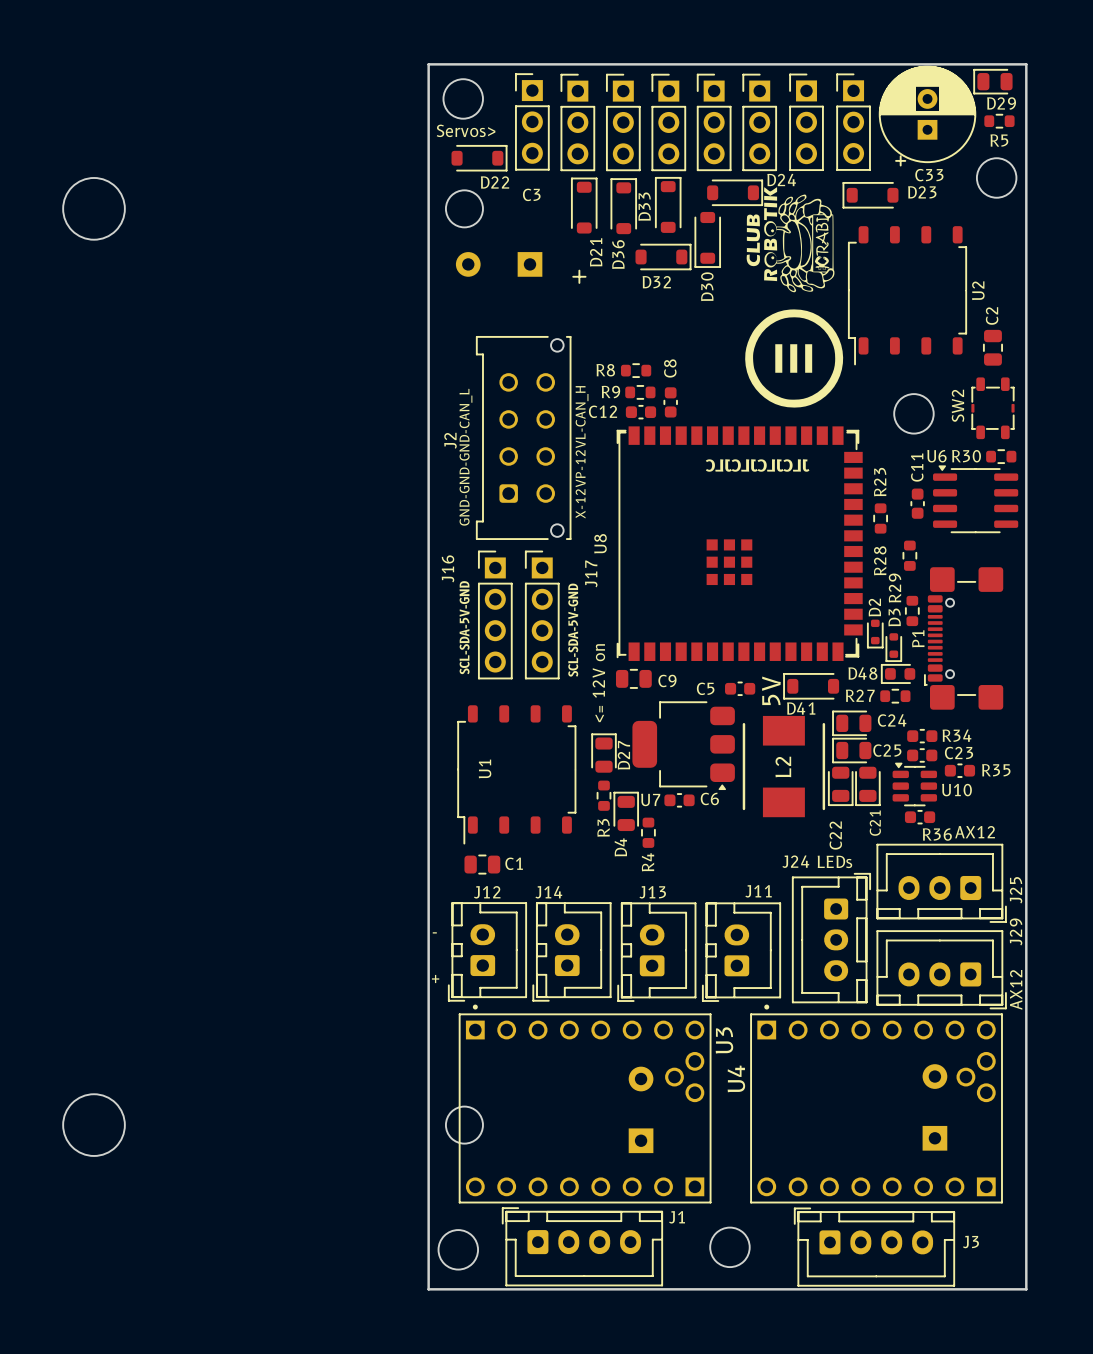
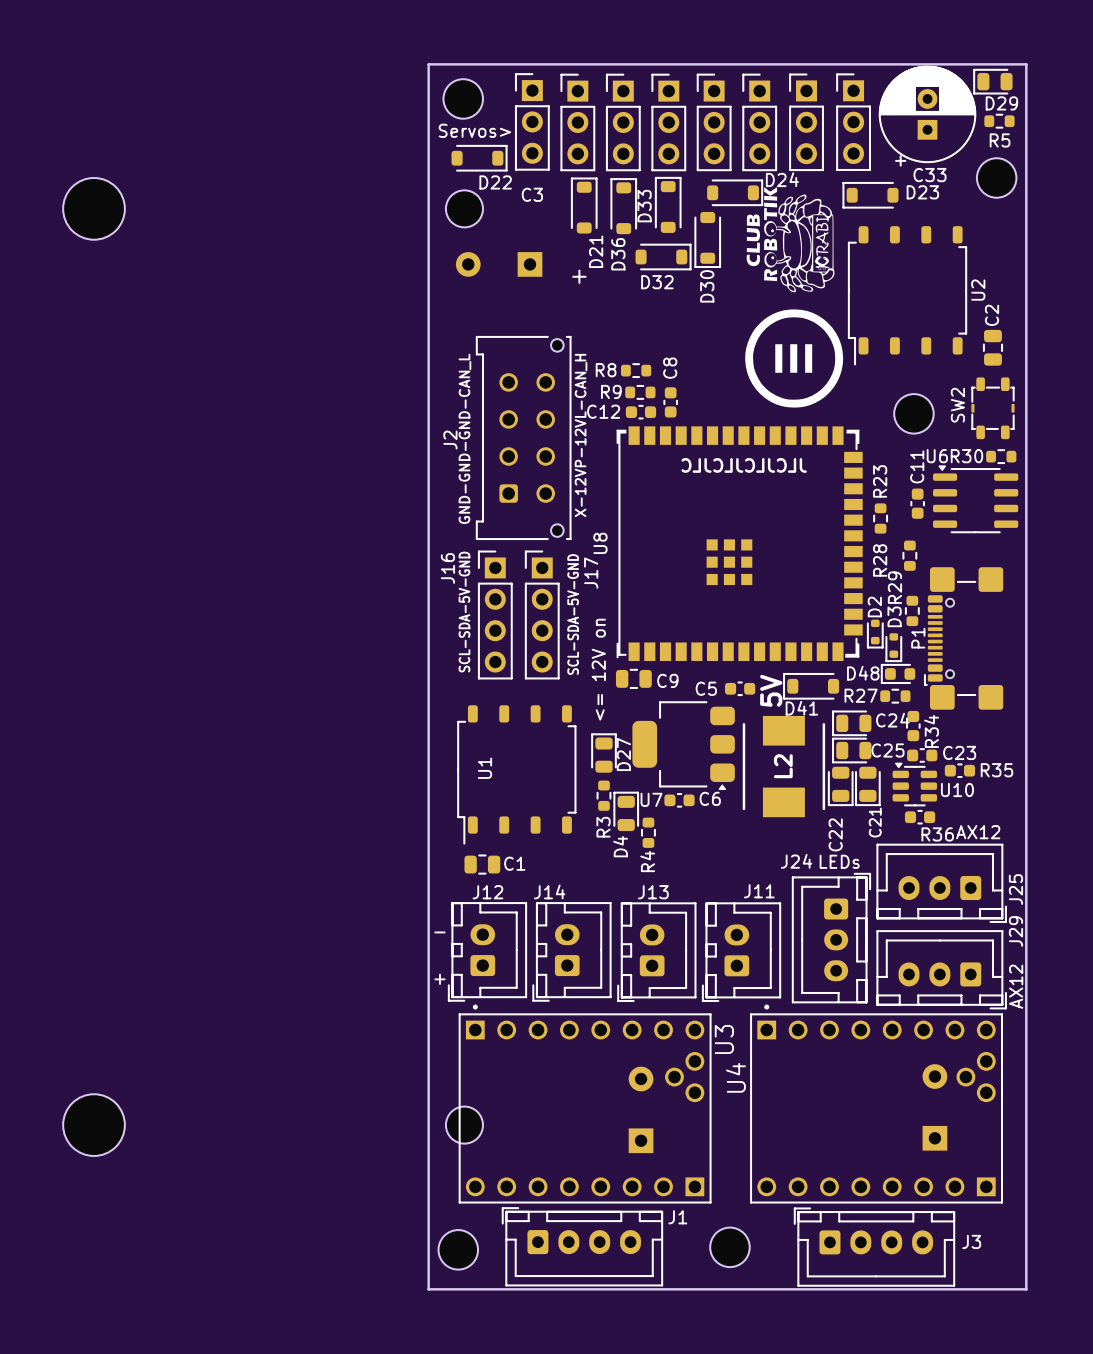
R34 rotation: 0° (922, 736) -> 90° clockwise (913, 726)

